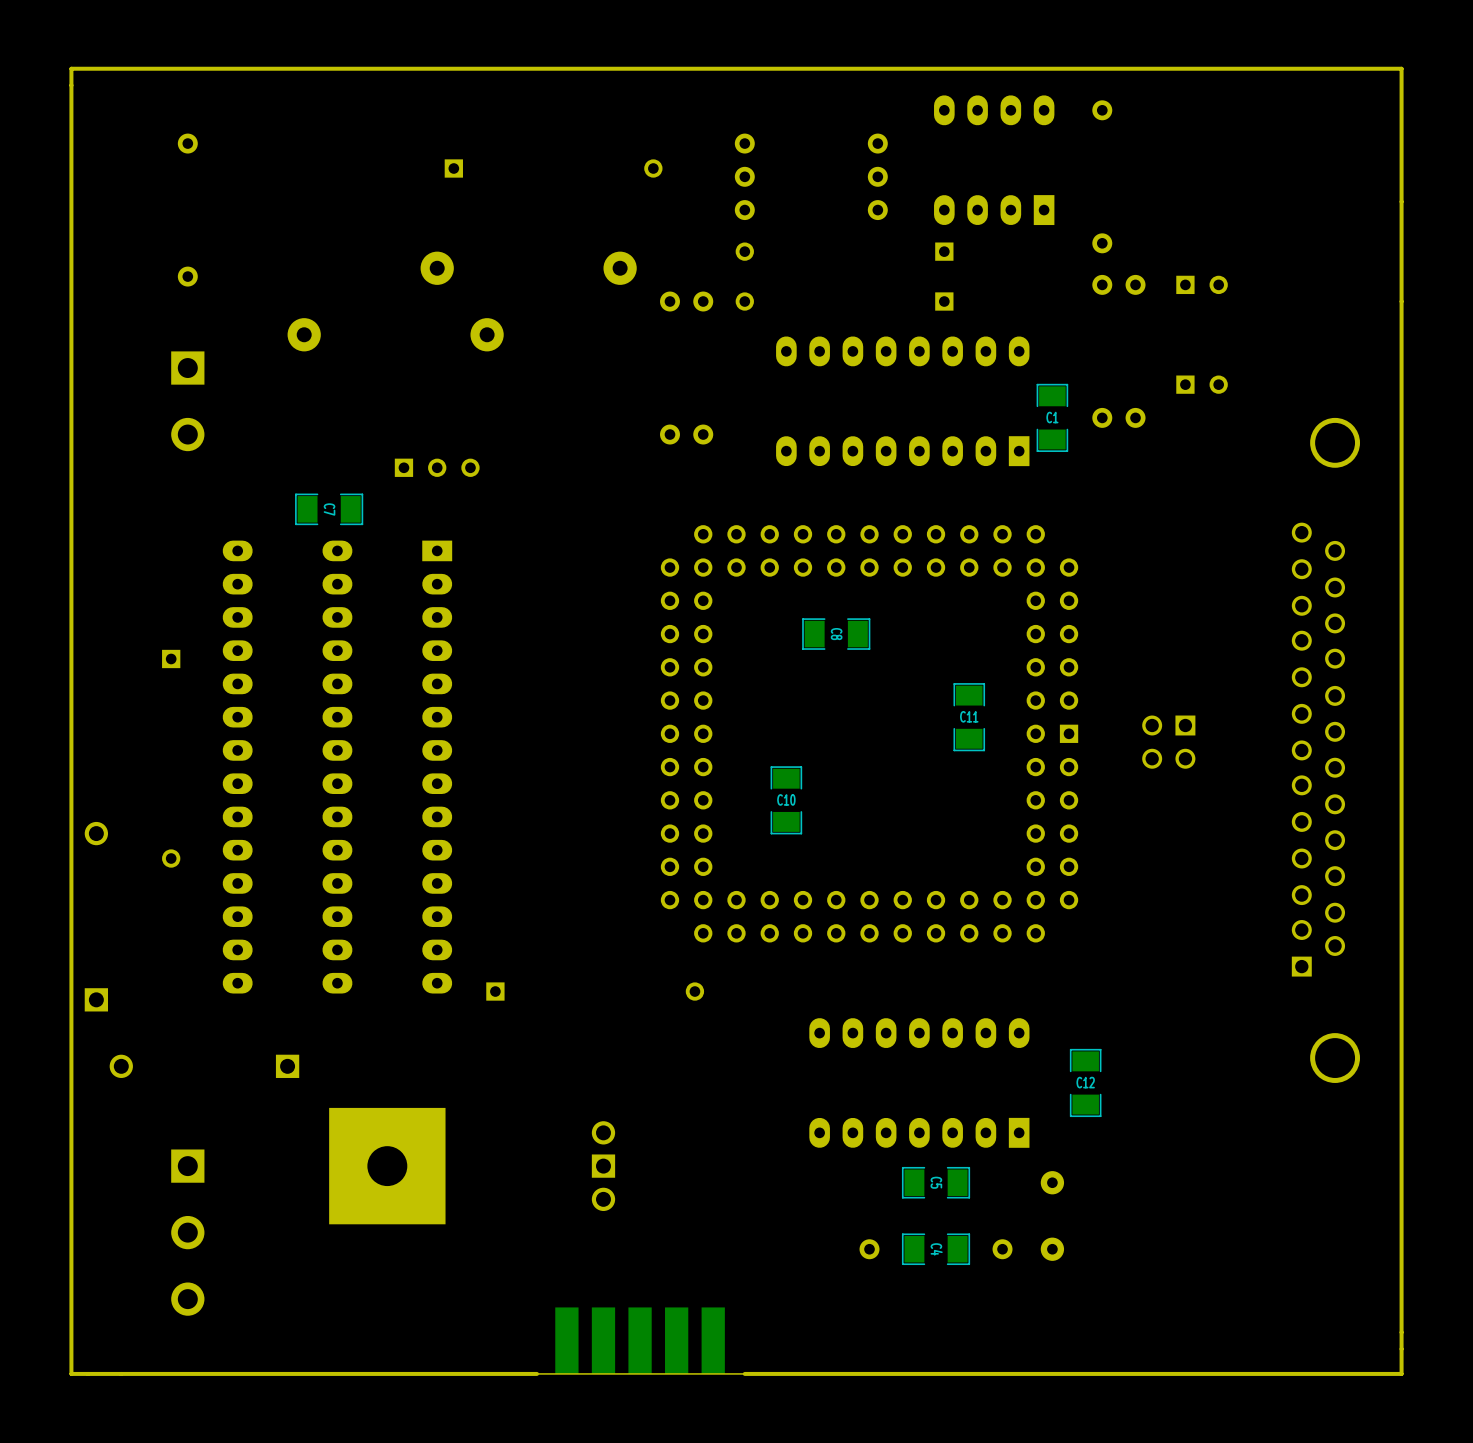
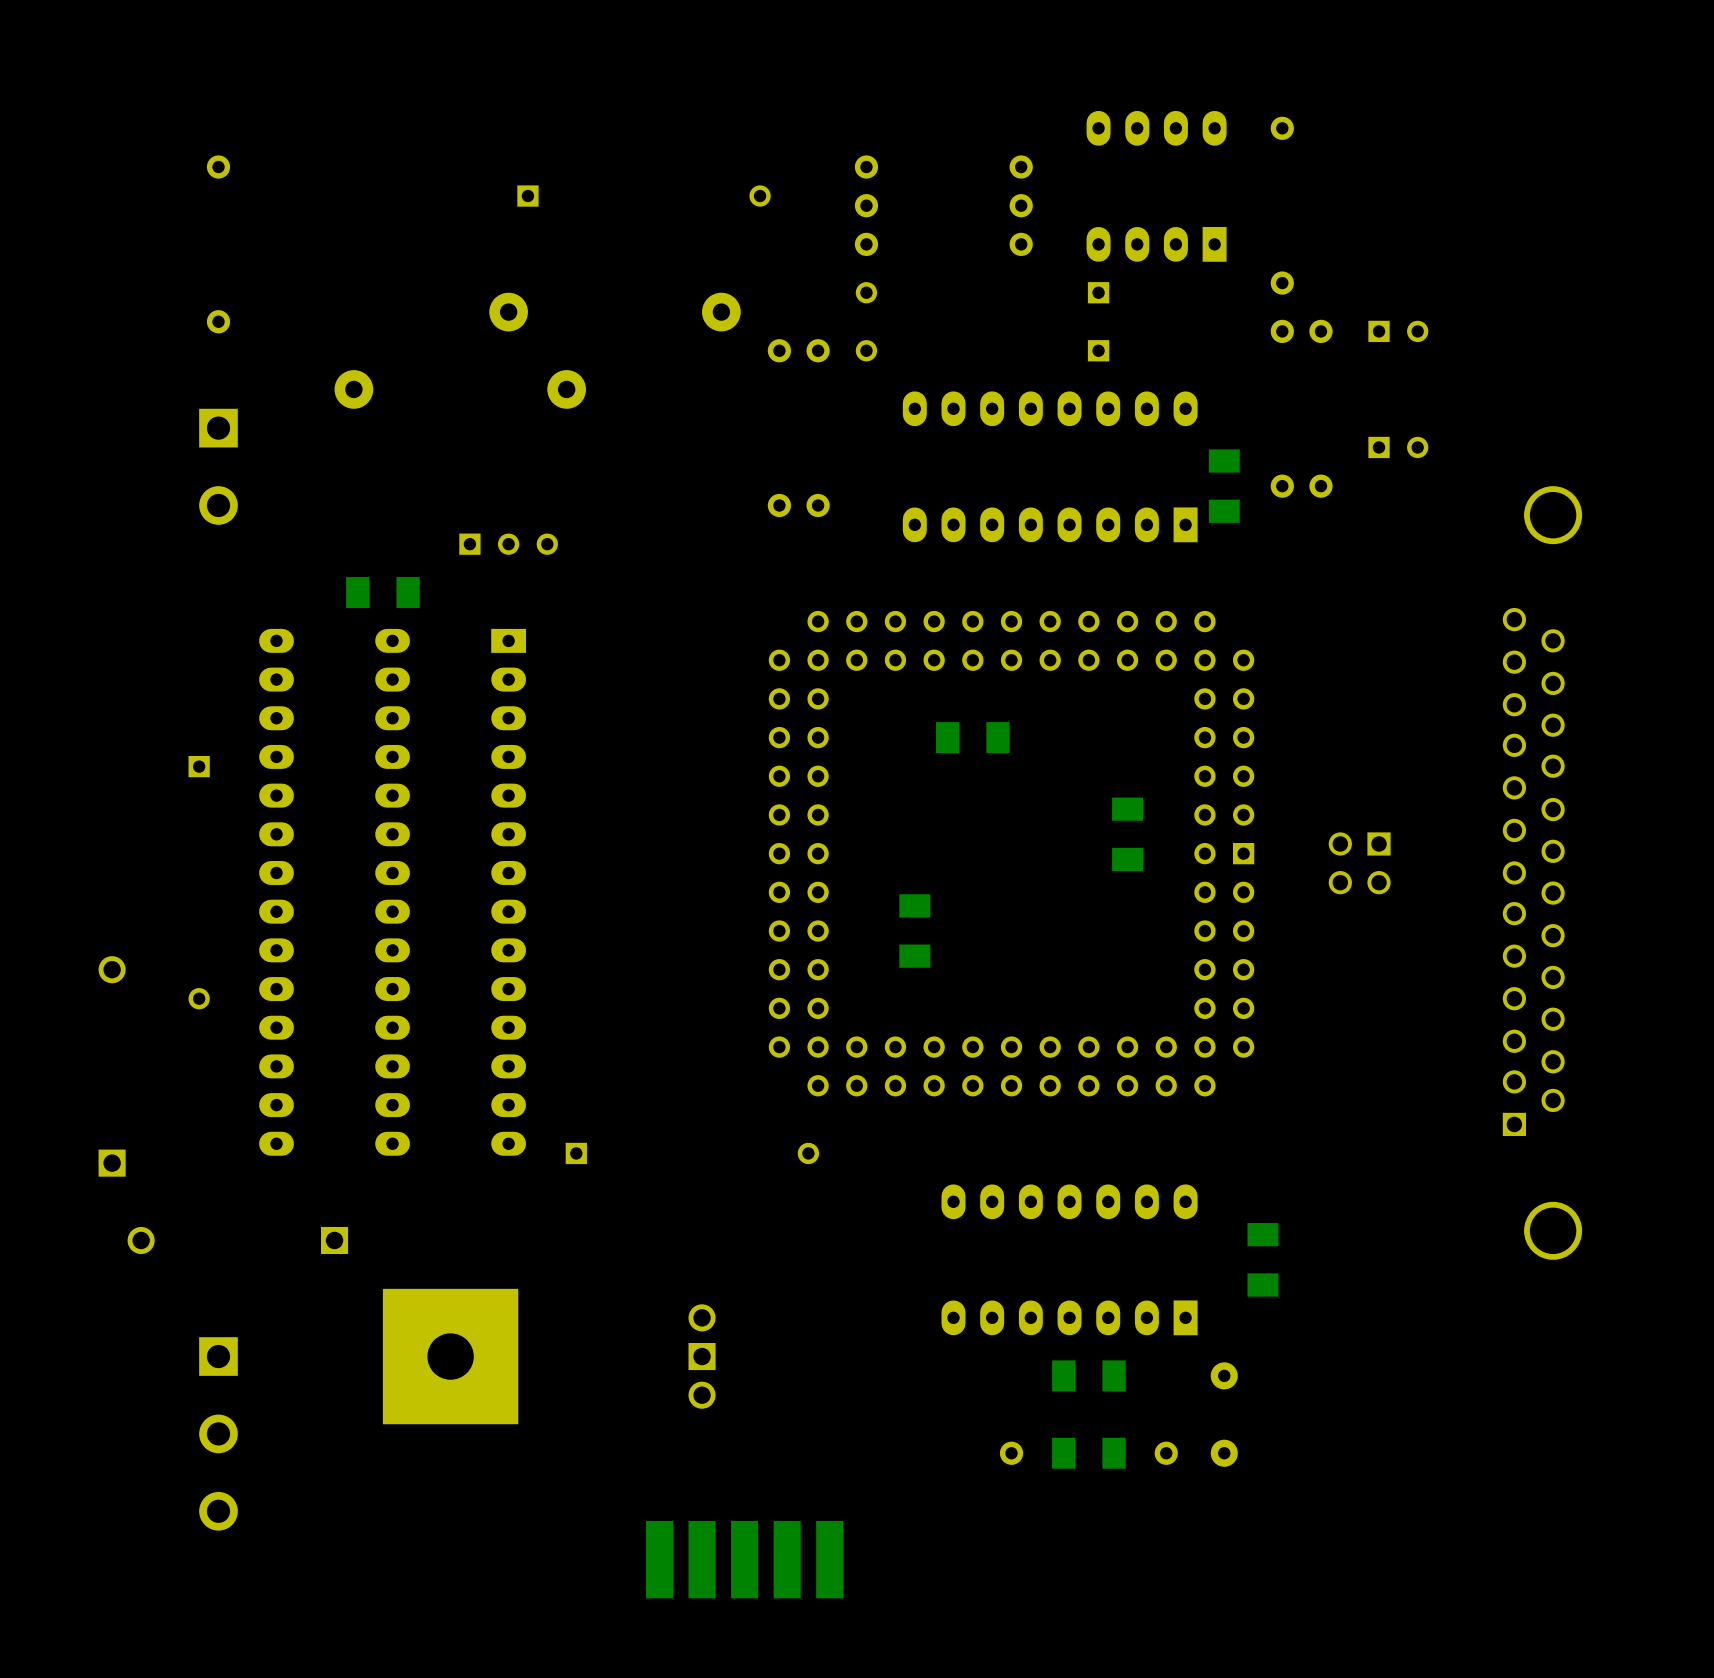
board edge: (1401, 68) (1401, 1373) (71, 1373) (71, 68) (1401, 68) -> none
C1: (1052, 417) -> none
part: none -> (1224, 486)
C7: (329, 509) -> none
part: none -> (382, 592)
C8: (836, 634) -> none
part: none -> (972, 737)
C11: (969, 717) -> none
part: none -> (1127, 834)
C10: (786, 800) -> none
part: none -> (914, 931)
C12: (1085, 1082) -> none
part: none -> (1262, 1259)
C5: (936, 1182) -> none
part: none -> (1088, 1375)
C4: (936, 1249) -> none
part: none -> (1088, 1453)

